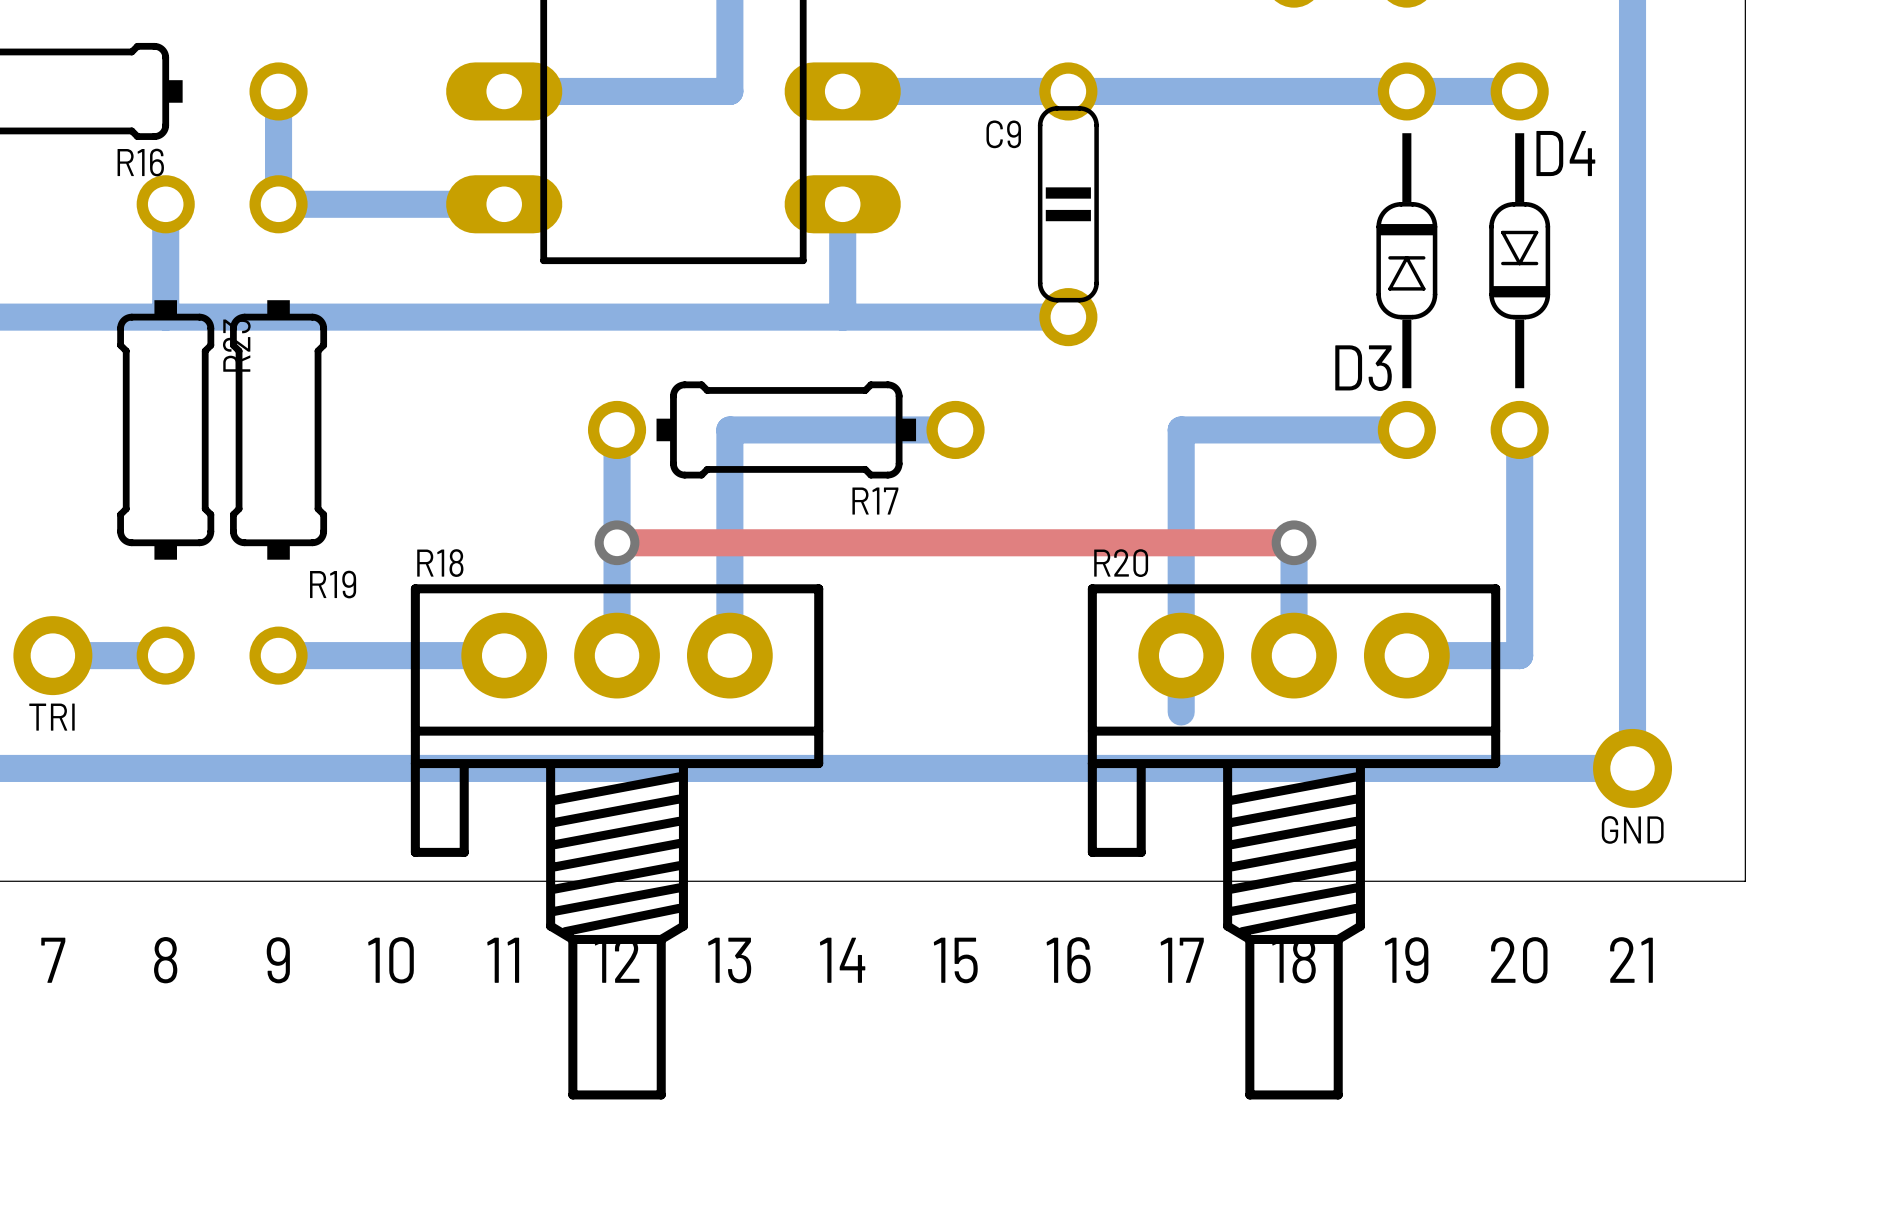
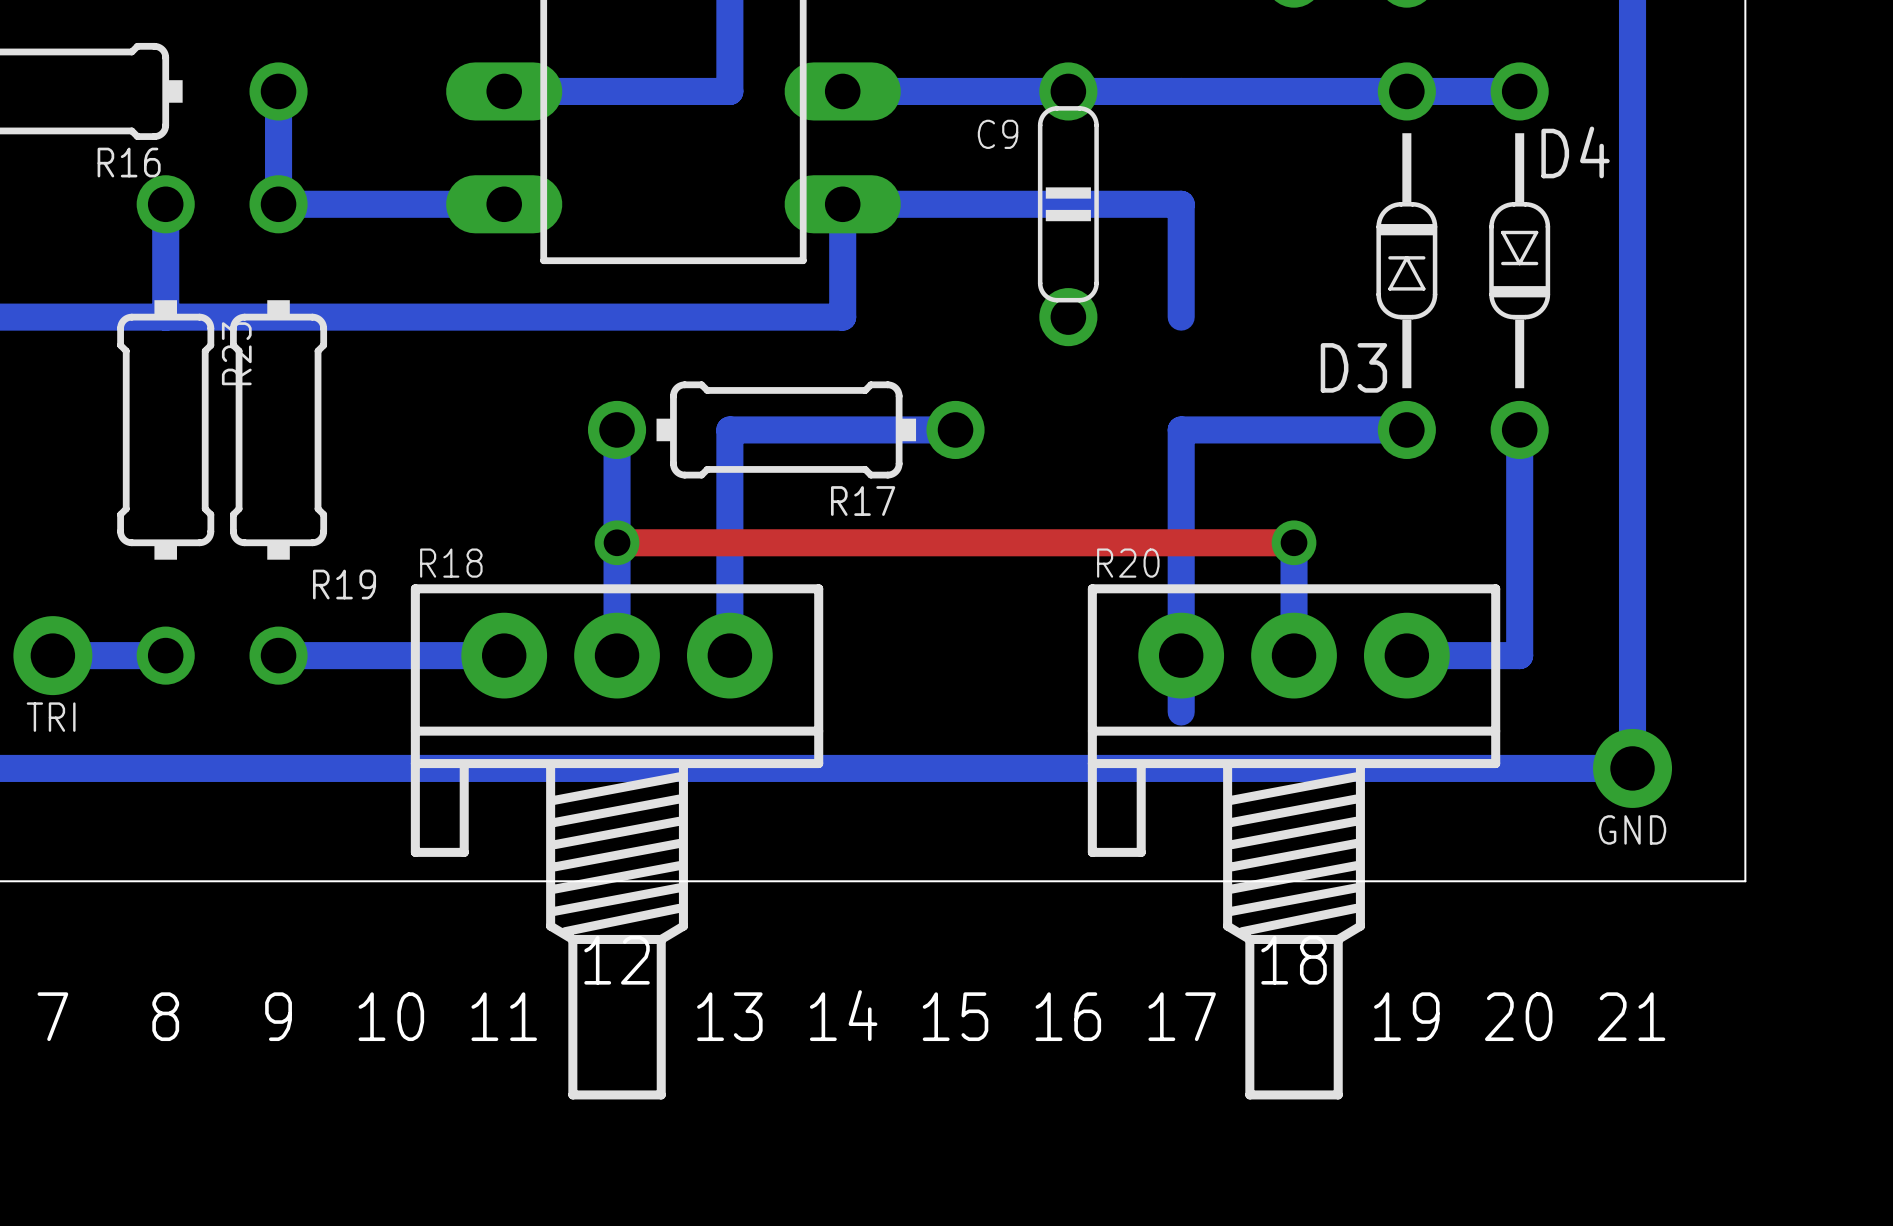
bottom track: none -> (842, 204) (1181, 204) (1181, 317)
bottom track: (842, 317) (1068, 317) -> none
text position: 7 (53, 960) -> 7 (52, 1016)
text position: 8 (165, 960) -> 8 (165, 1016)
text position: 9 (278, 960) -> 9 (278, 1016)
text position: 10 (391, 960) -> 10 (391, 1016)
text position: 11 (503, 960) -> 11 (504, 1016)
text position: 13 (729, 960) -> 13 (729, 1016)
text position: 14 (842, 960) -> 14 (843, 1015)
text position: 15 (955, 960) -> 15 (955, 1016)
text position: 16 (1068, 960) -> 16 (1068, 1016)
text position: 17 (1182, 960) -> 17 (1182, 1016)
text position: 19 (1406, 960) -> 19 (1406, 1016)
text position: 20 (1519, 960) -> 20 (1518, 1016)
text position: 21 (1631, 960) -> 21 (1631, 1016)

